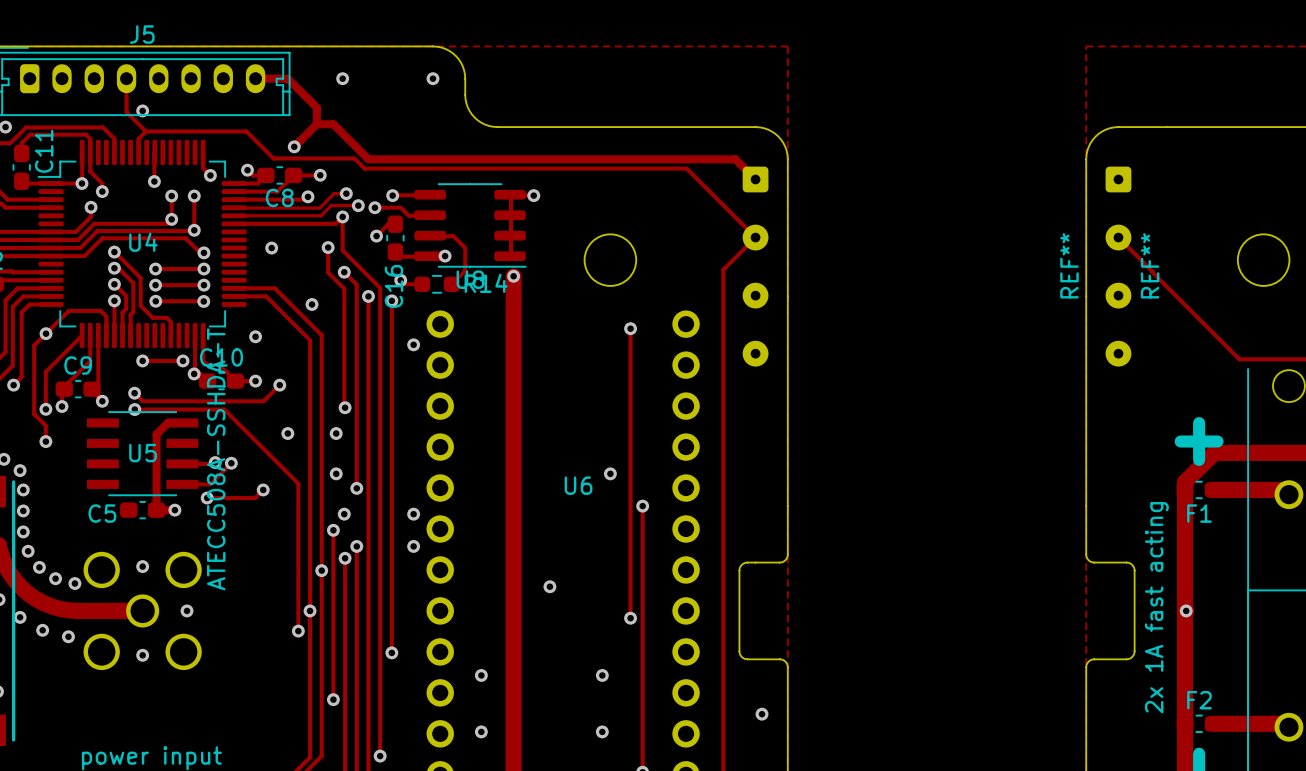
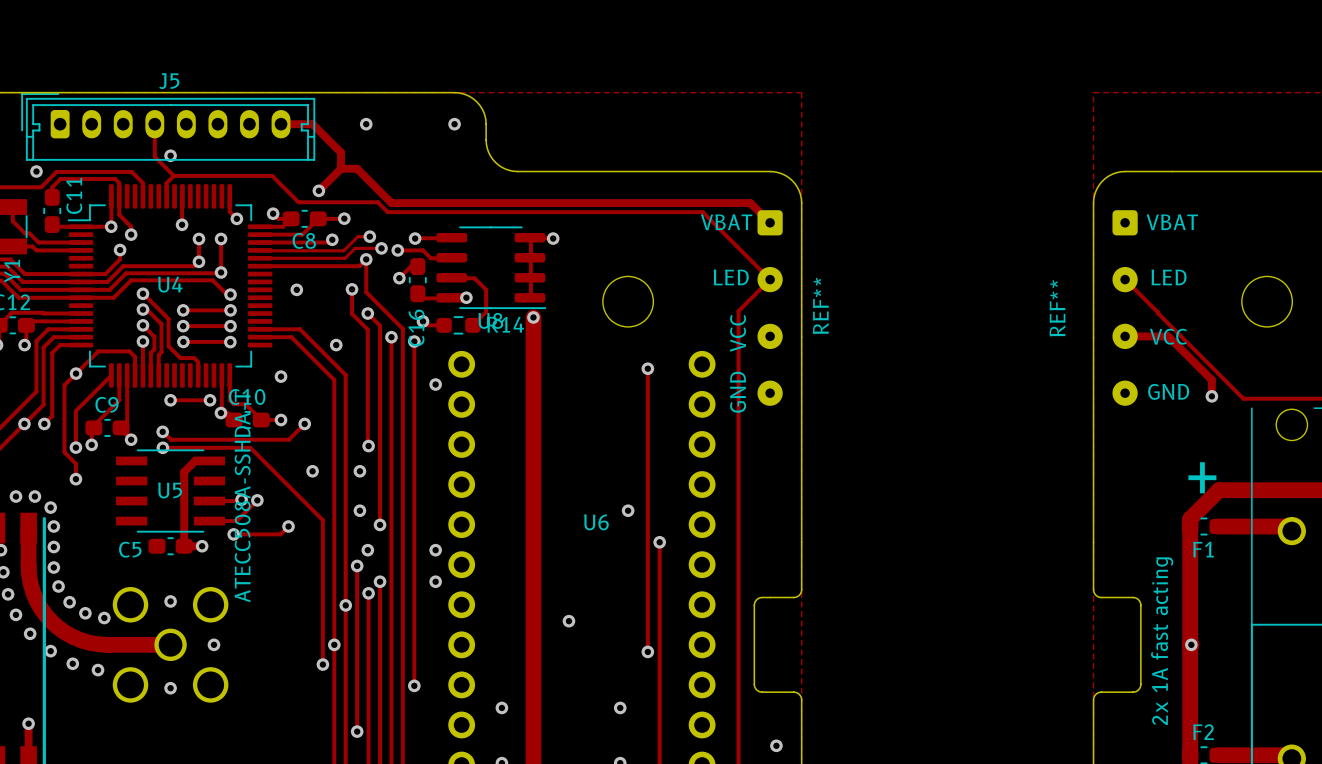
text: none -> VBAT (726, 222)
text: none -> VBAT (1172, 222)
text: none -> LED (731, 277)
text: none -> LED (1169, 277)
REF** name position: REF** (1069, 265) -> REF** (820, 305)
REF** name position: REF** (1150, 265) -> REF** (1057, 308)
text: none -> VCC (738, 333)
track: none -> (1125, 336) (1168, 336) (1211, 379) (1211, 396)
text: none -> VCC (1168, 336)
text: none -> GND (738, 392)
text: none -> GND (1168, 391)
via: none -> (1211, 396)

